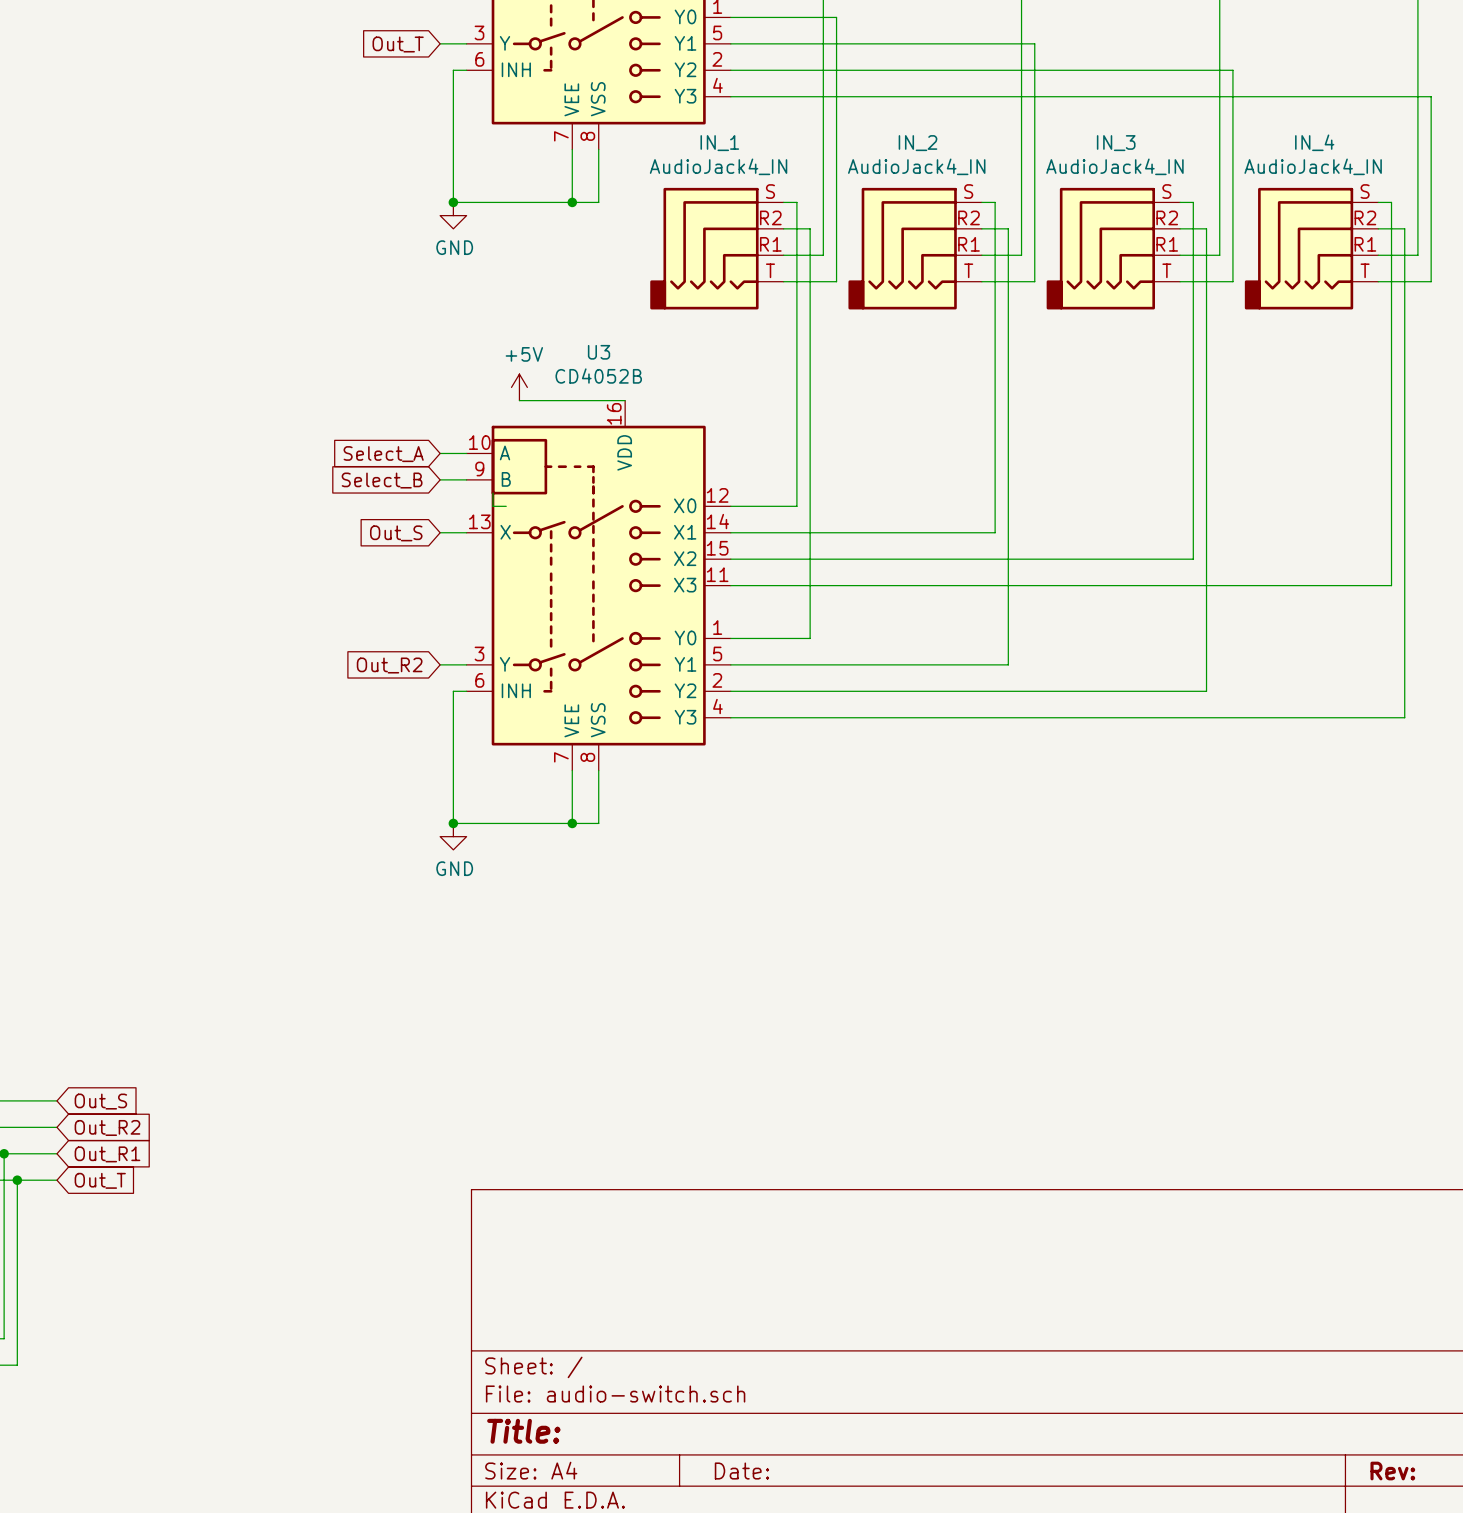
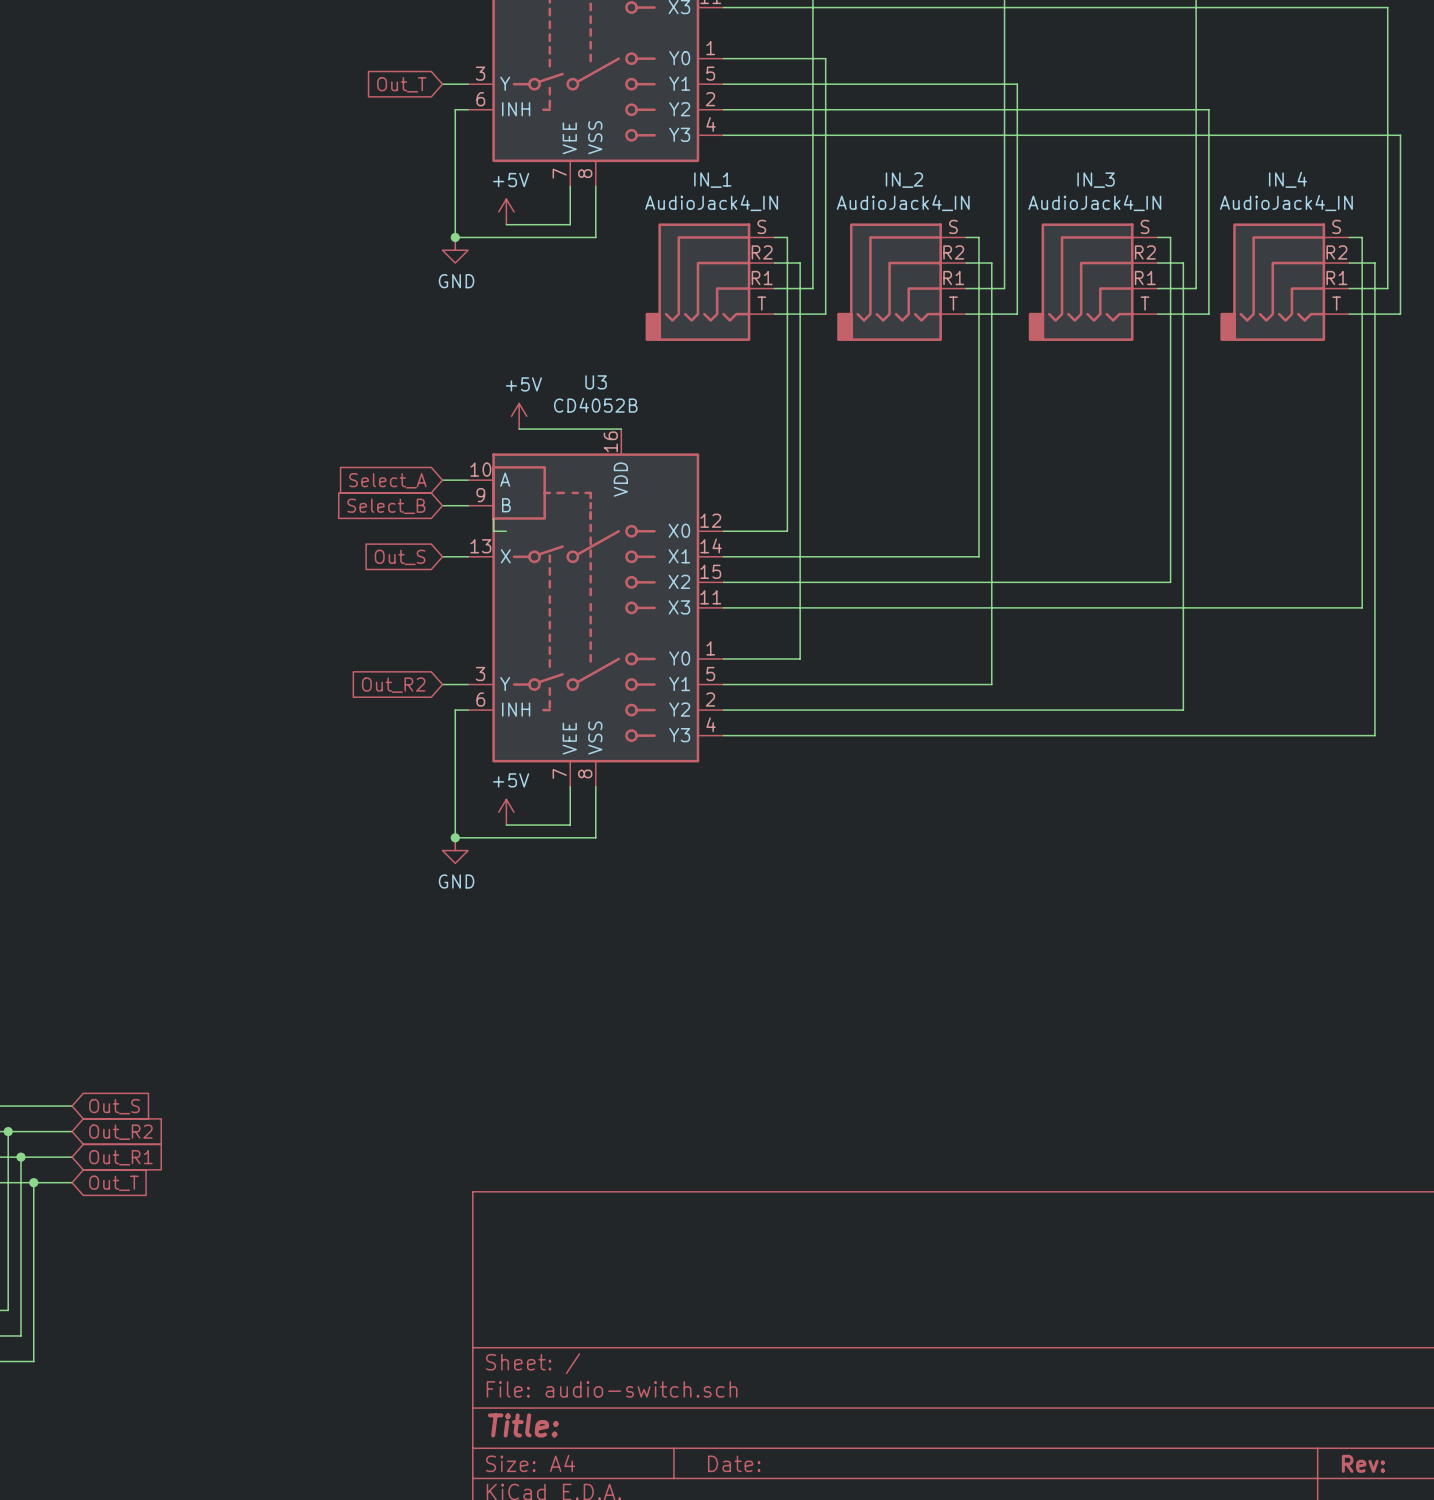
power symbol: none -> +5V (506, 211)
wire: (572, 189) (572, 202) -> (570, 224) (506, 224)
junction: (572, 202) -> none
power symbol: none -> +5V (506, 812)
wire: (572, 810) (572, 823) -> (570, 825) (506, 825)
junction: (572, 823) -> none

